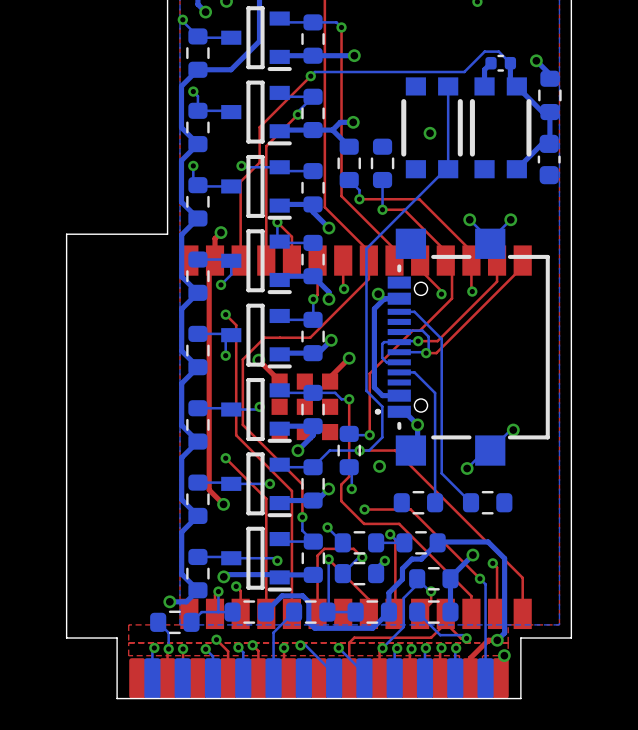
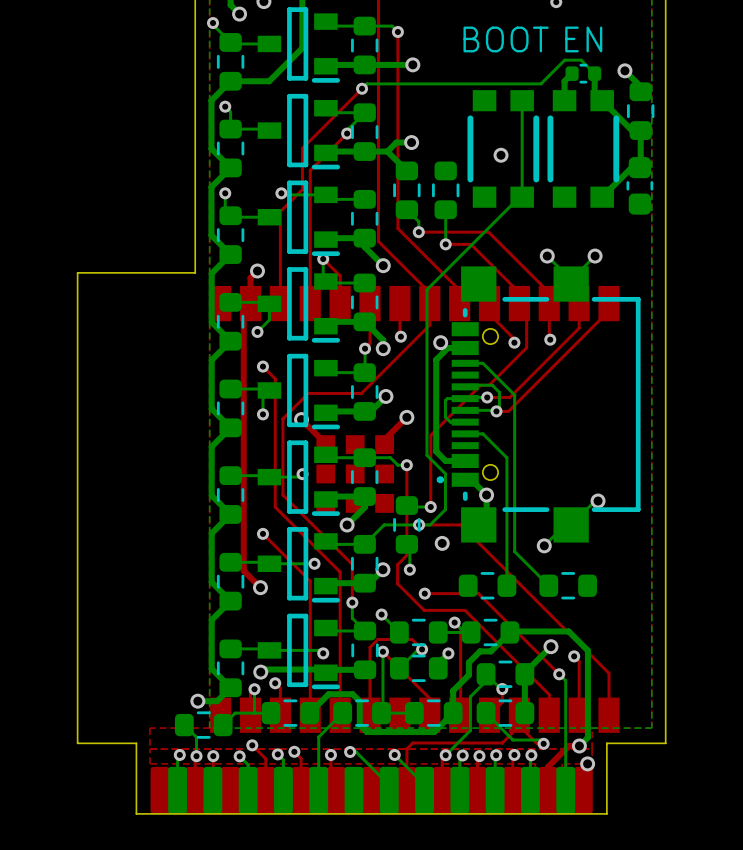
text: none -> BOOT (506, 39)
text: none -> EN (583, 39)

